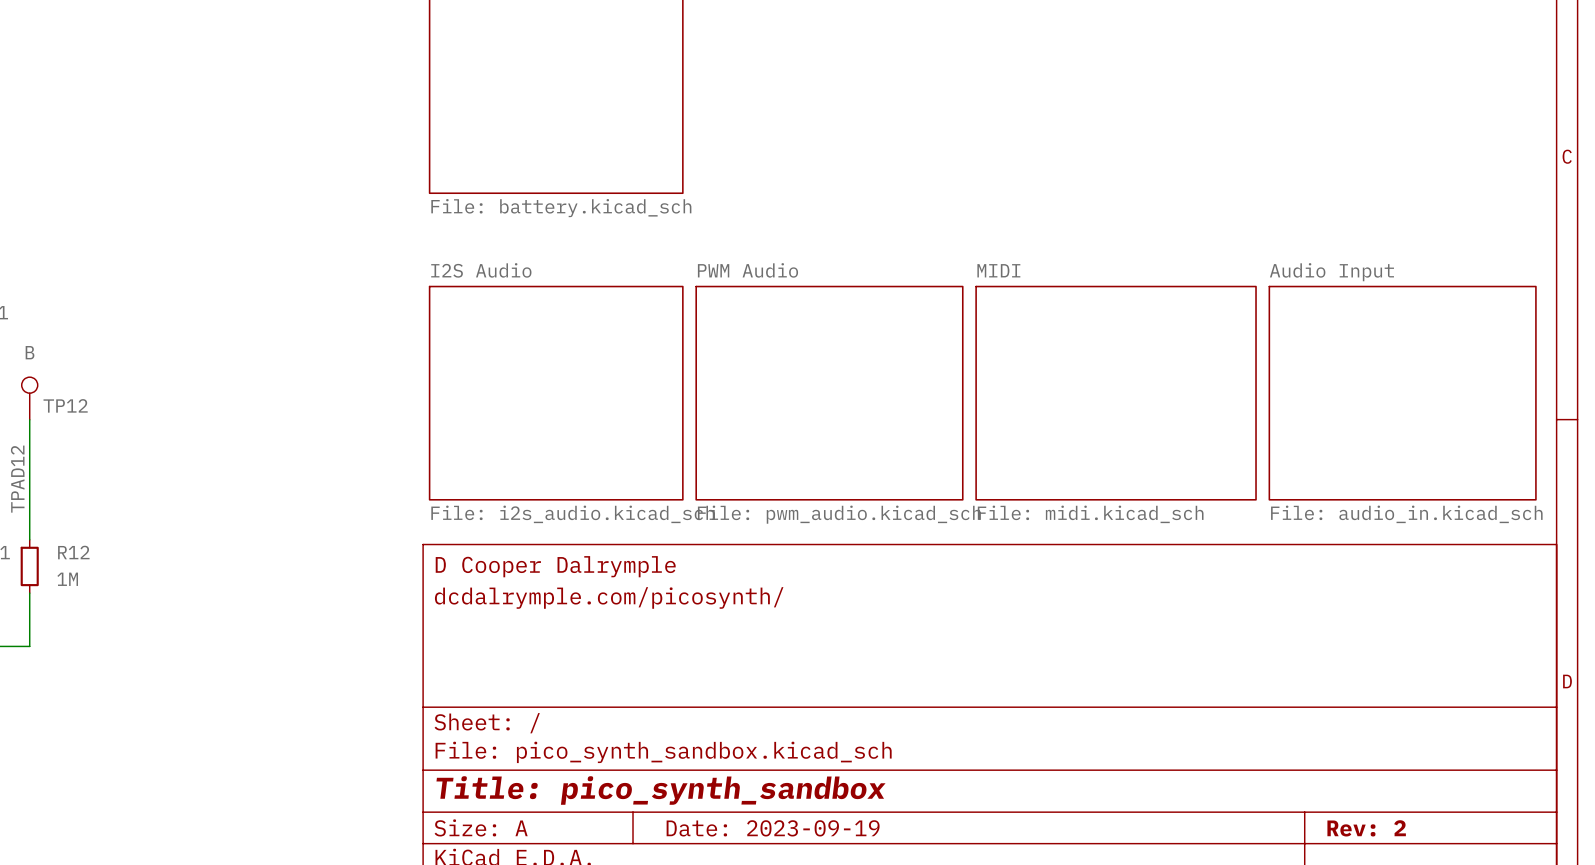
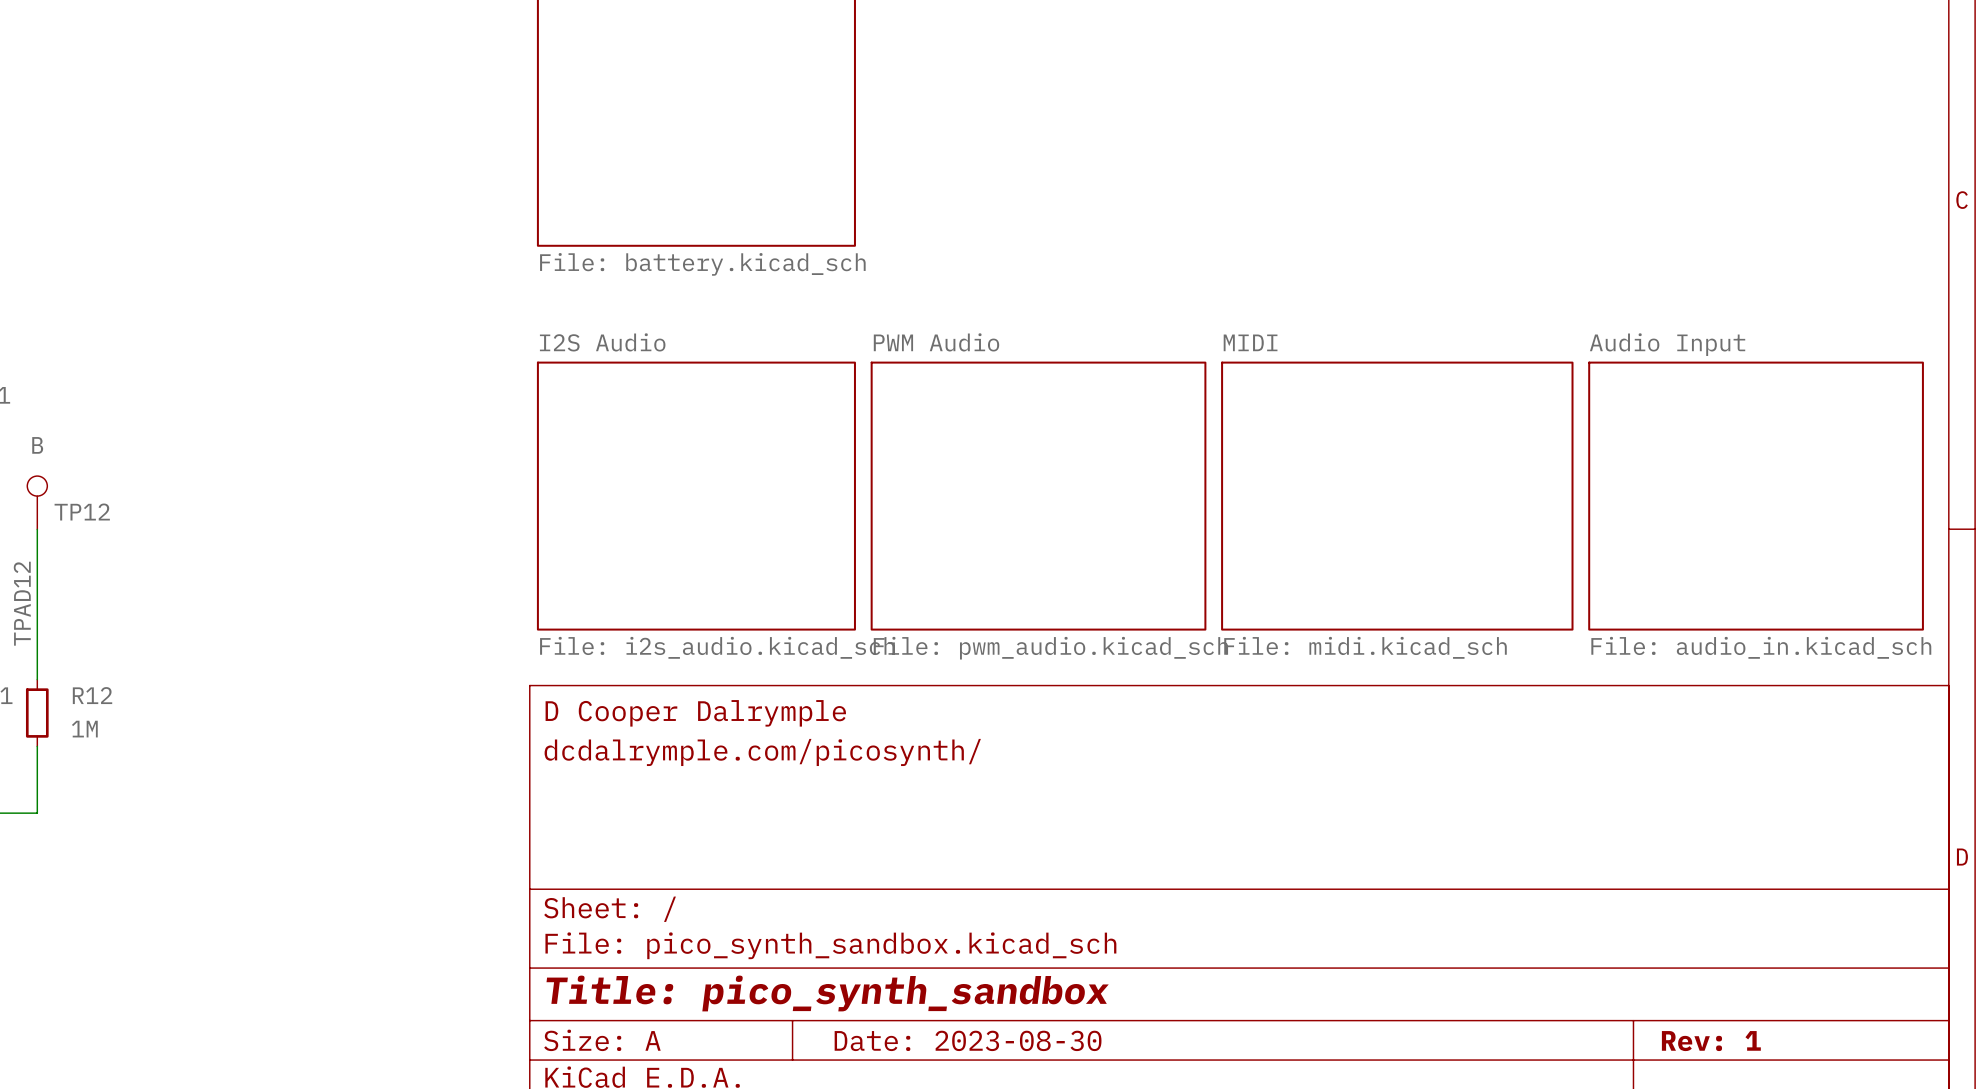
title block: Date: 2023-09-19 (773, 828) -> Date: 2023-08-30 (968, 1040)
title block: Rev: 2 (1366, 828) -> Rev: 1 (1711, 1041)

